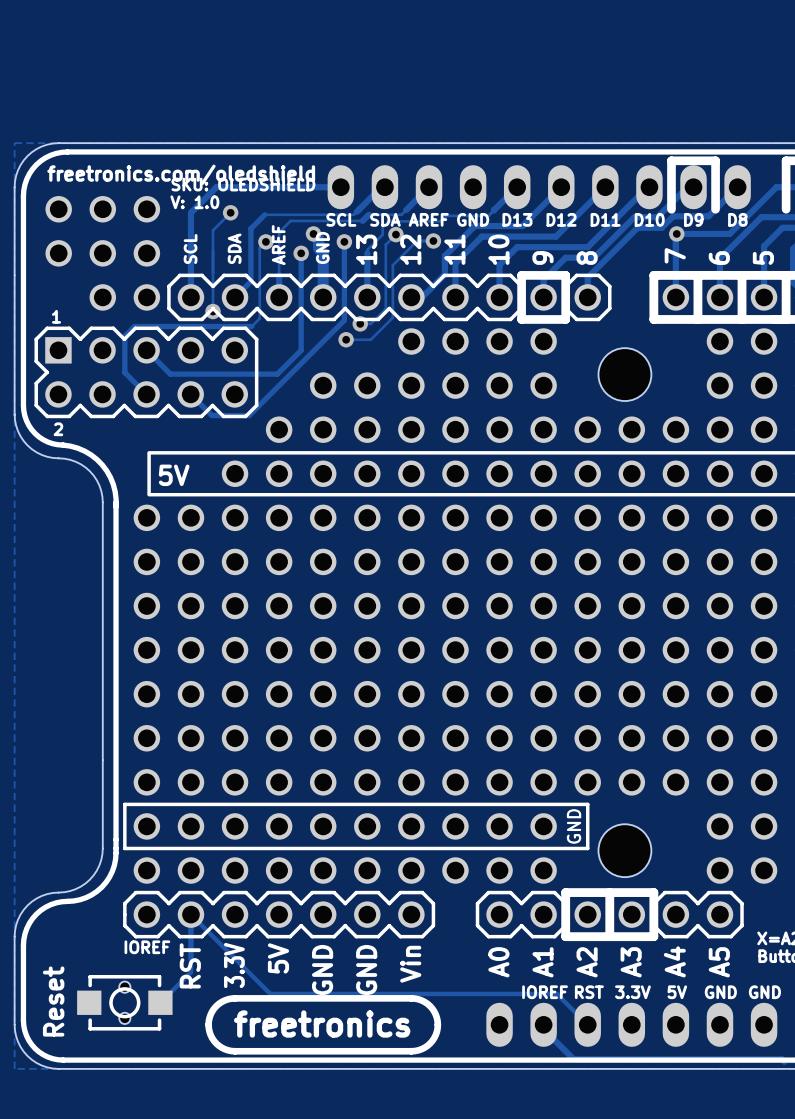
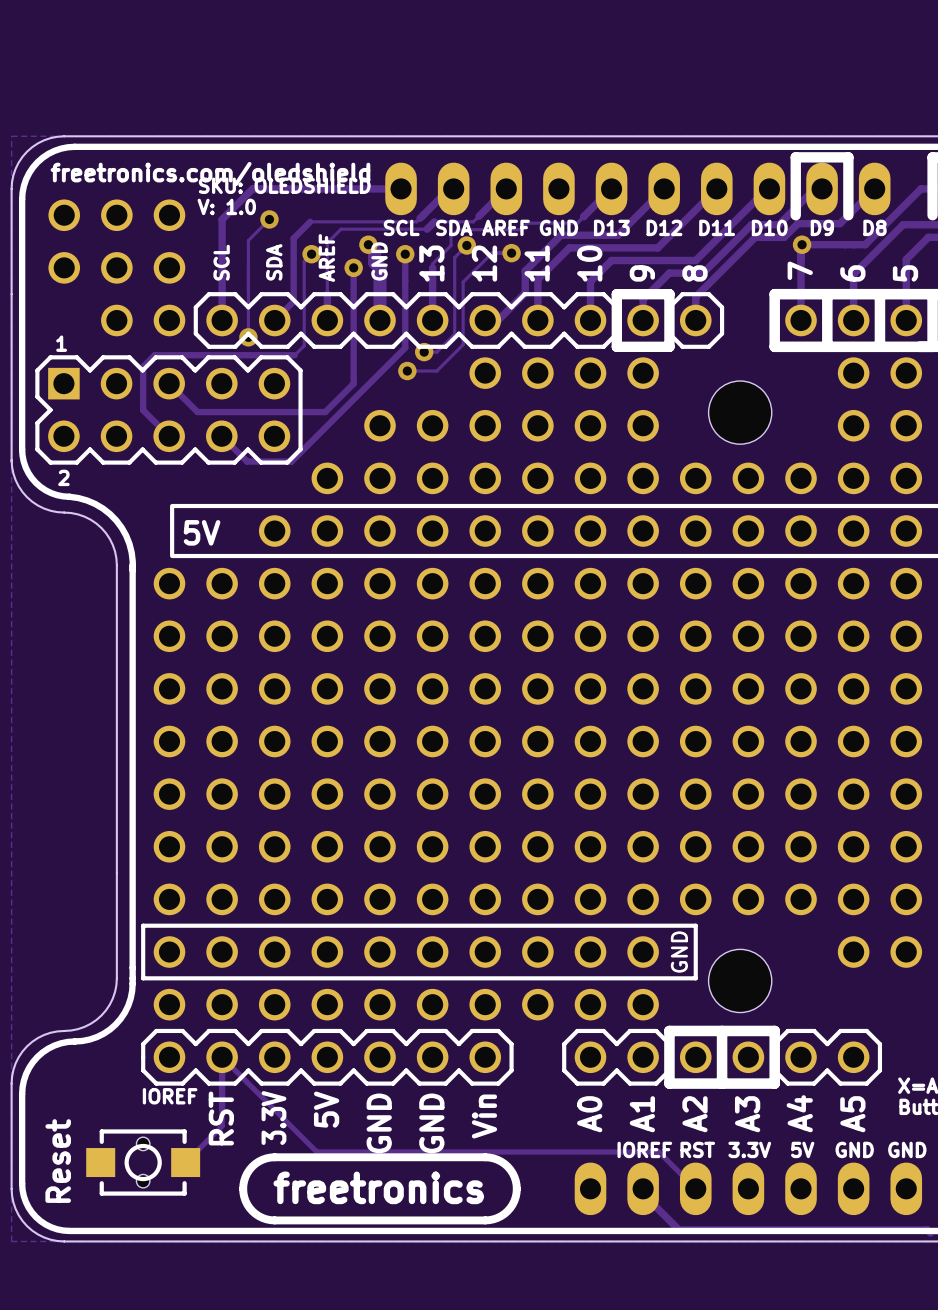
part: (719, 870) -> none
part: (764, 870) -> none

